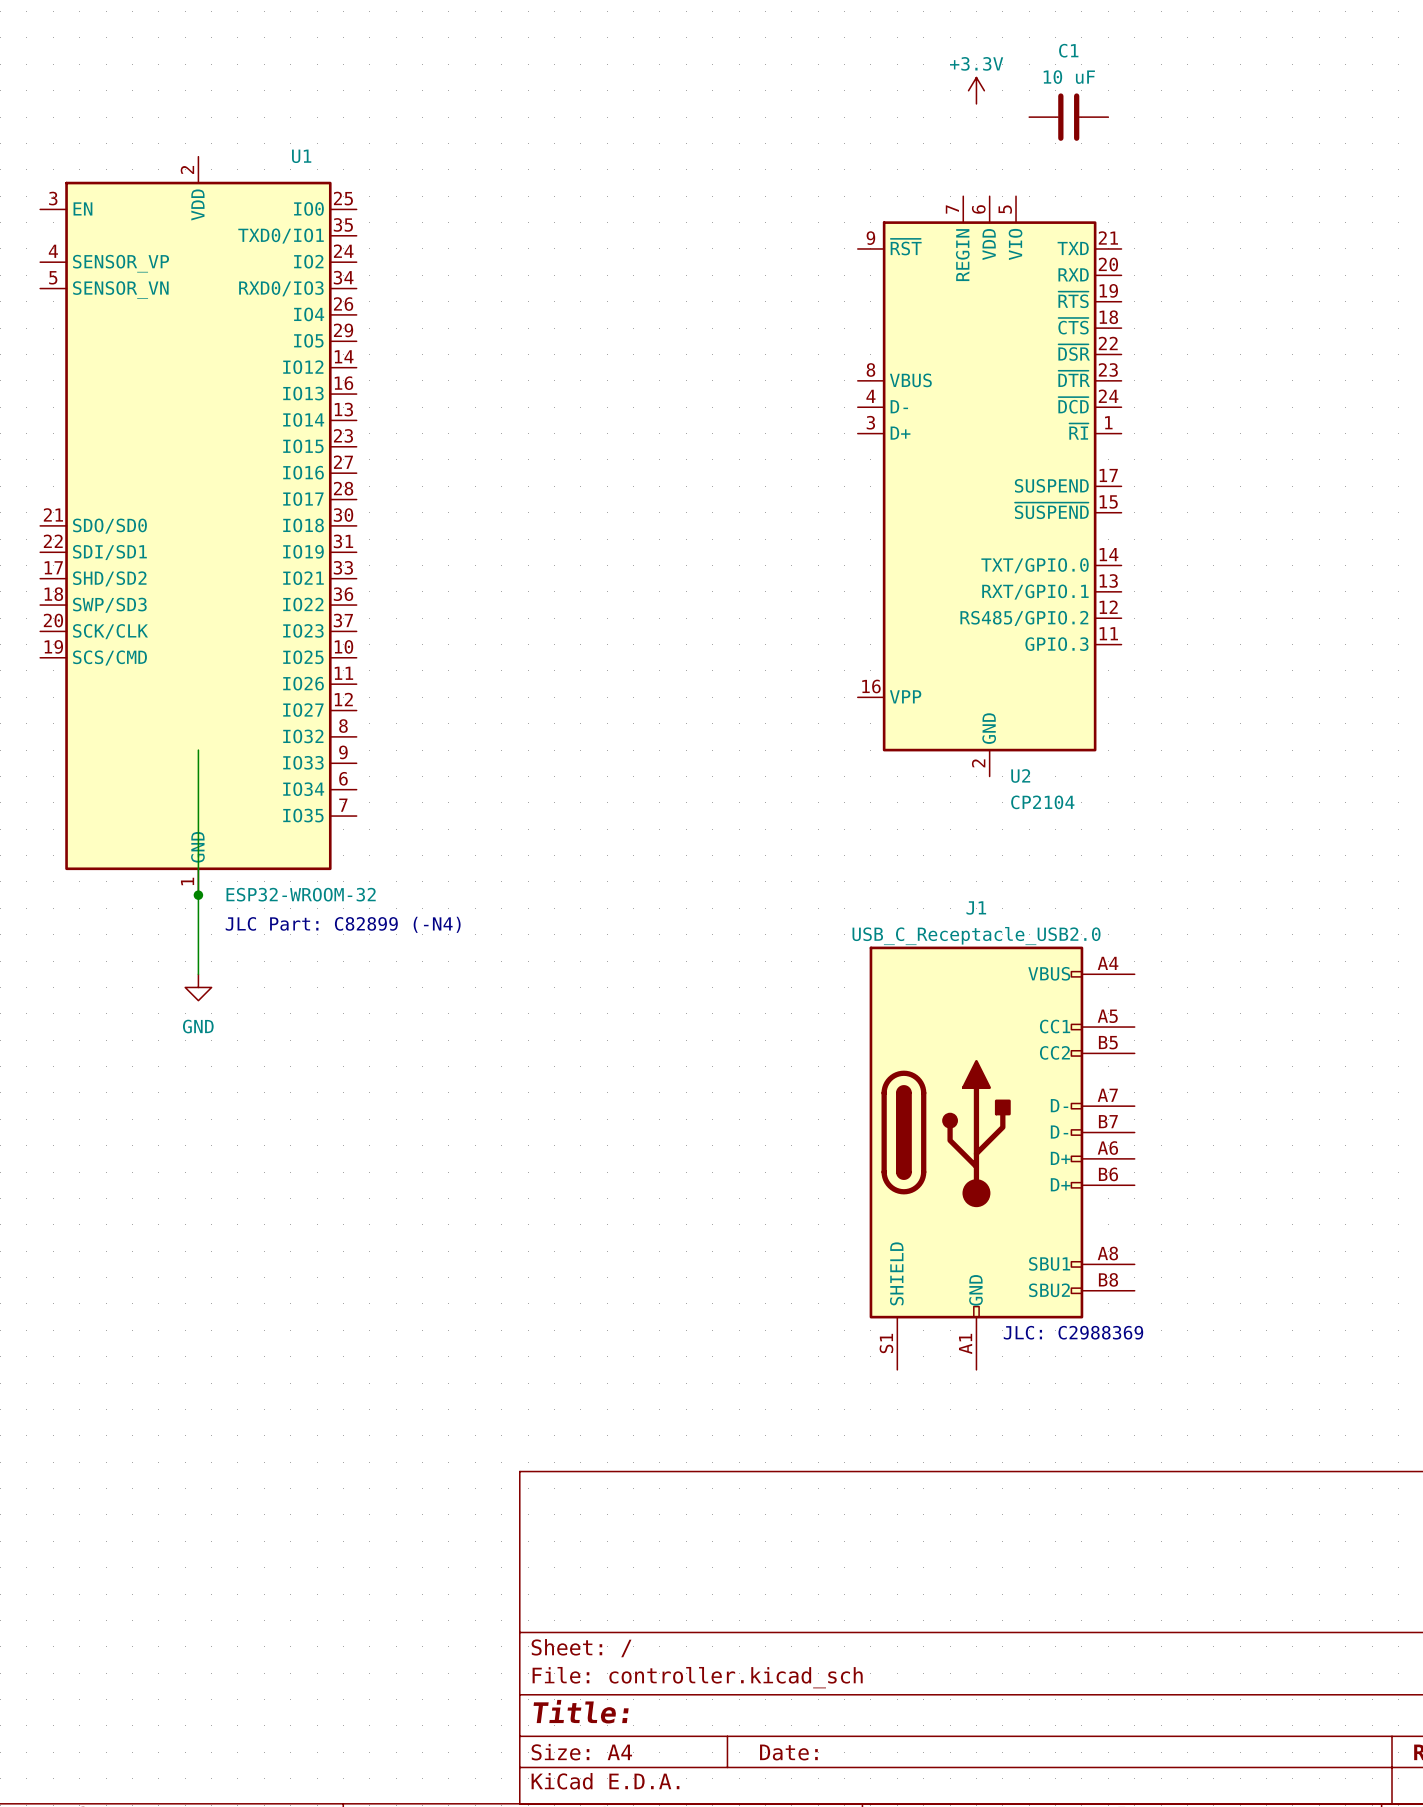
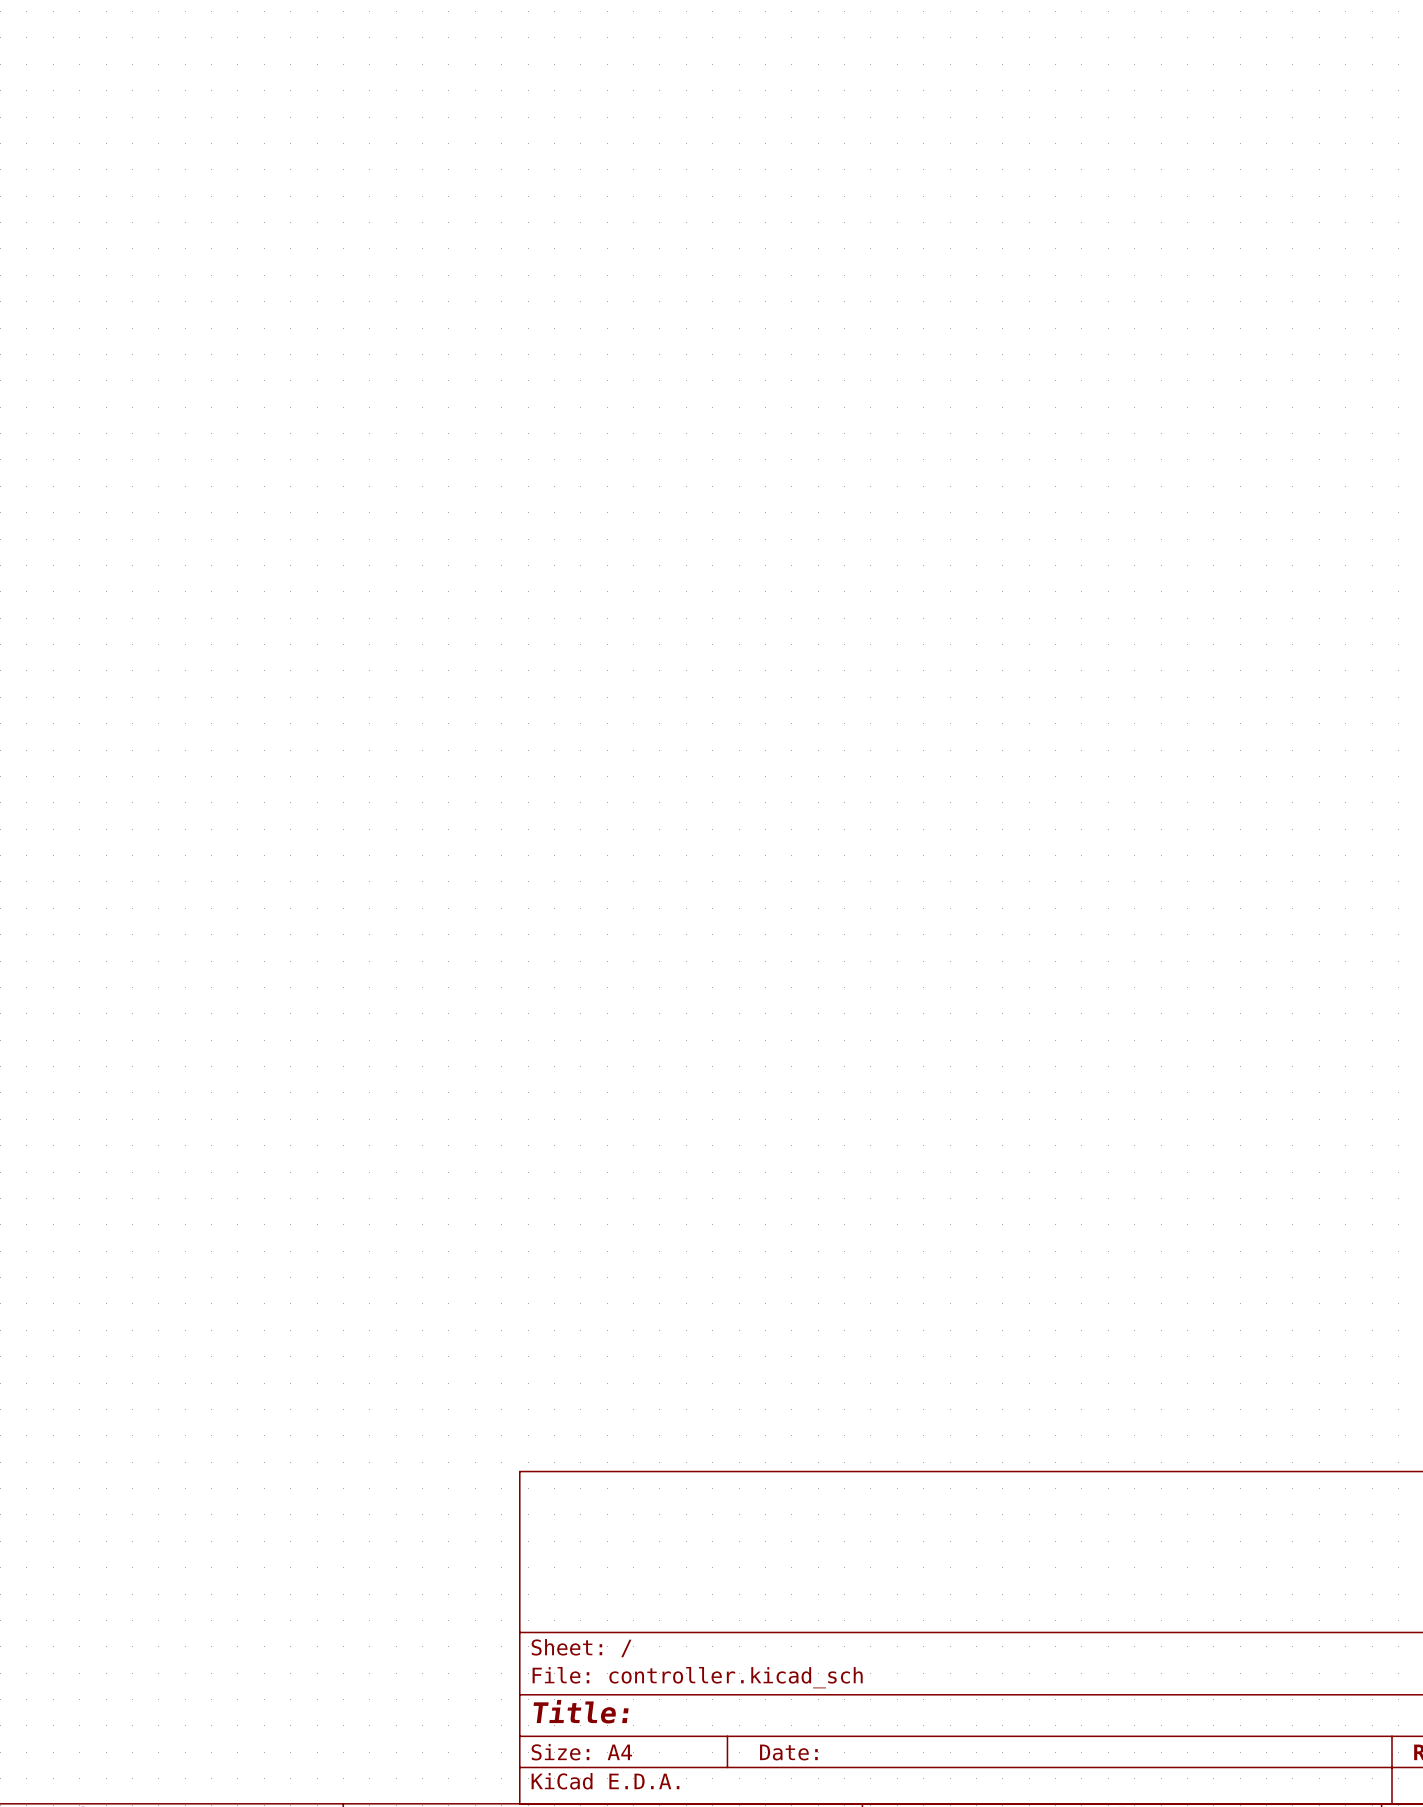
power symbol: +3.3V (976, 90) -> none
C1: 10 uF (1068, 117) -> none
U2: CP2104 (989, 486) -> none
U1: ESP32-WROOM-32 (198, 525) -> none
wire: (198, 750) (198, 974) -> none
junction: (198, 895) -> none
text: JLC Part: C82899 (-N4) (343, 924) -> none
power symbol: GND (198, 987) -> none
J1: USB_C_Receptacle_USB2.0 (1002, 1158) -> none
text: JLC: C2988369 (1073, 1332) -> none

